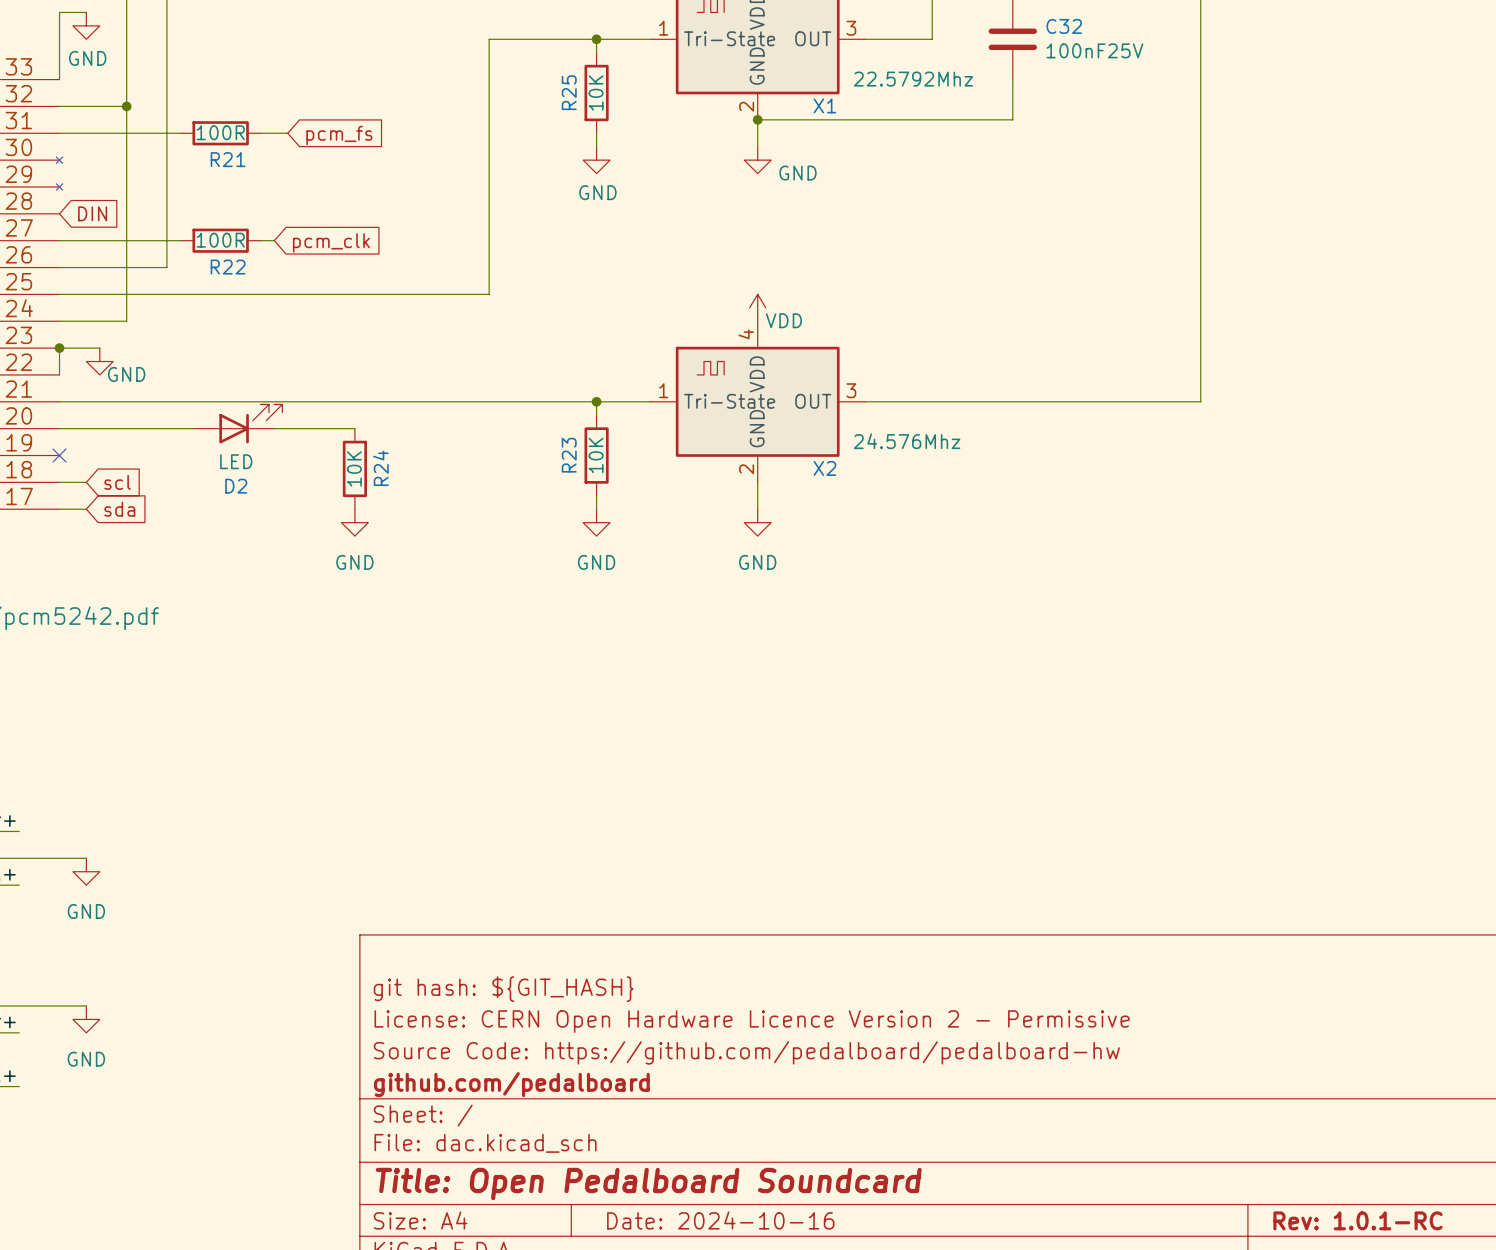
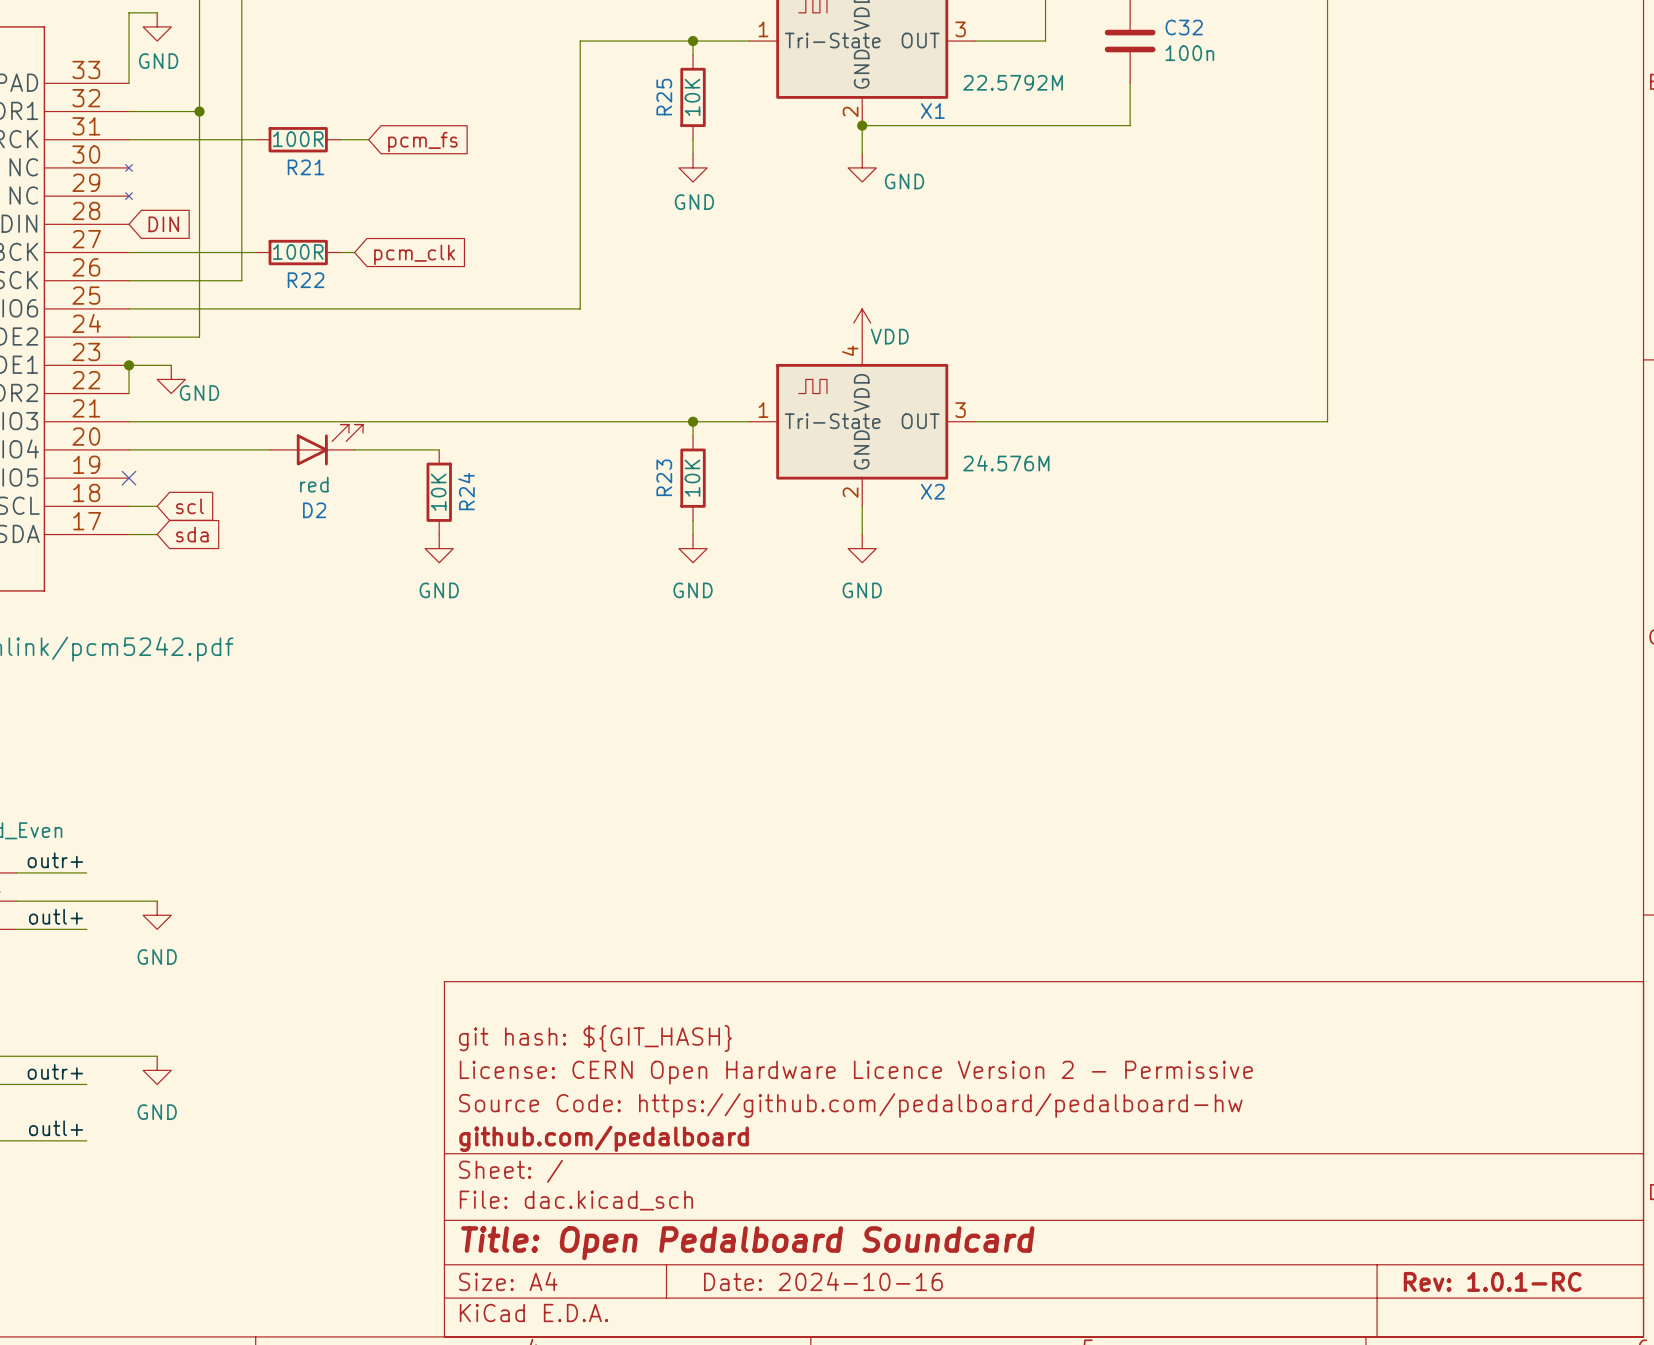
C32 value: 100nF25V (1094, 50) -> 100n (1189, 53)
X1 value: 22.5792Mhz (913, 79) -> 22.5792M (1013, 82)
X2 value: 24.576Mhz (907, 441) -> 24.576M (1006, 463)
D2 value: LED (236, 461) -> red (314, 484)

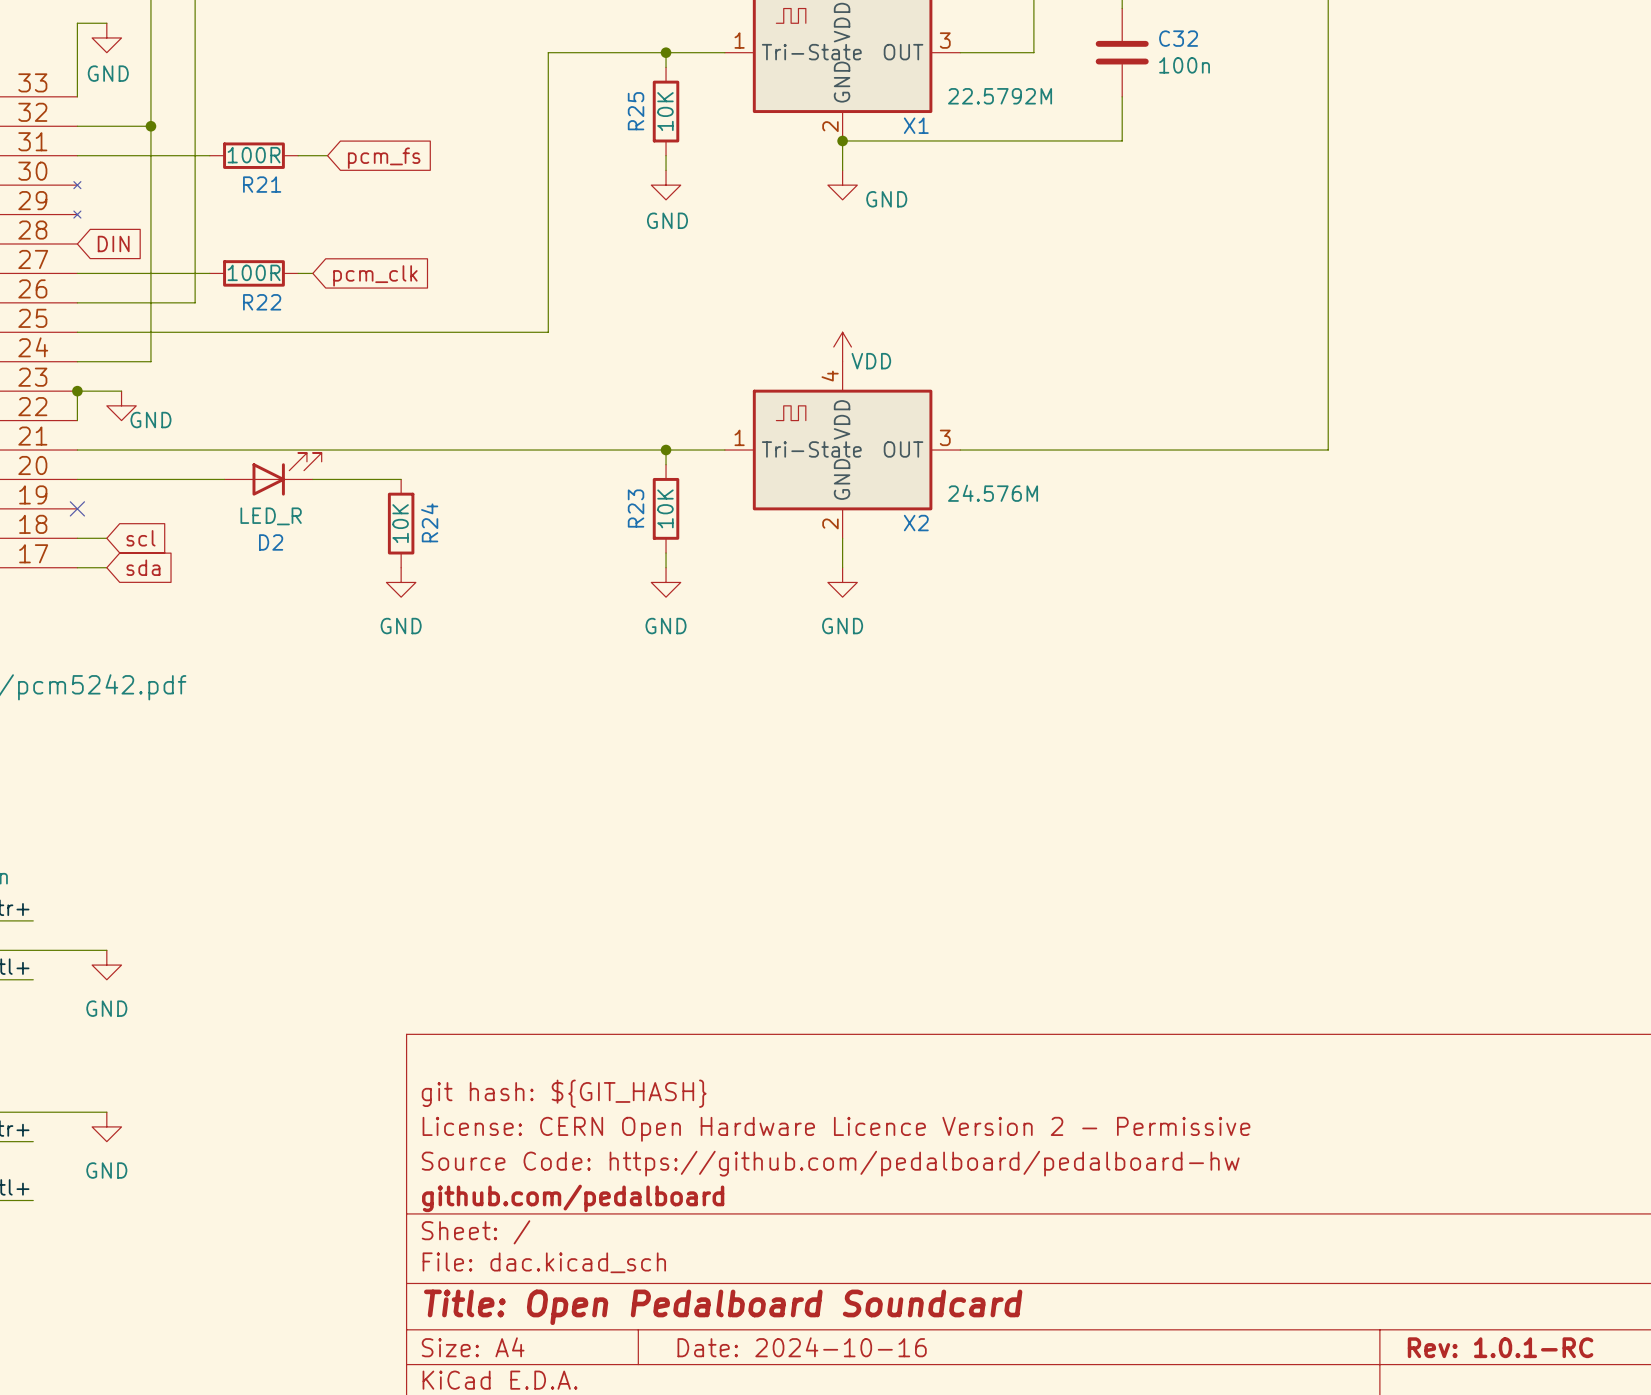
D2 value: red (314, 484) -> LED_R (271, 516)

